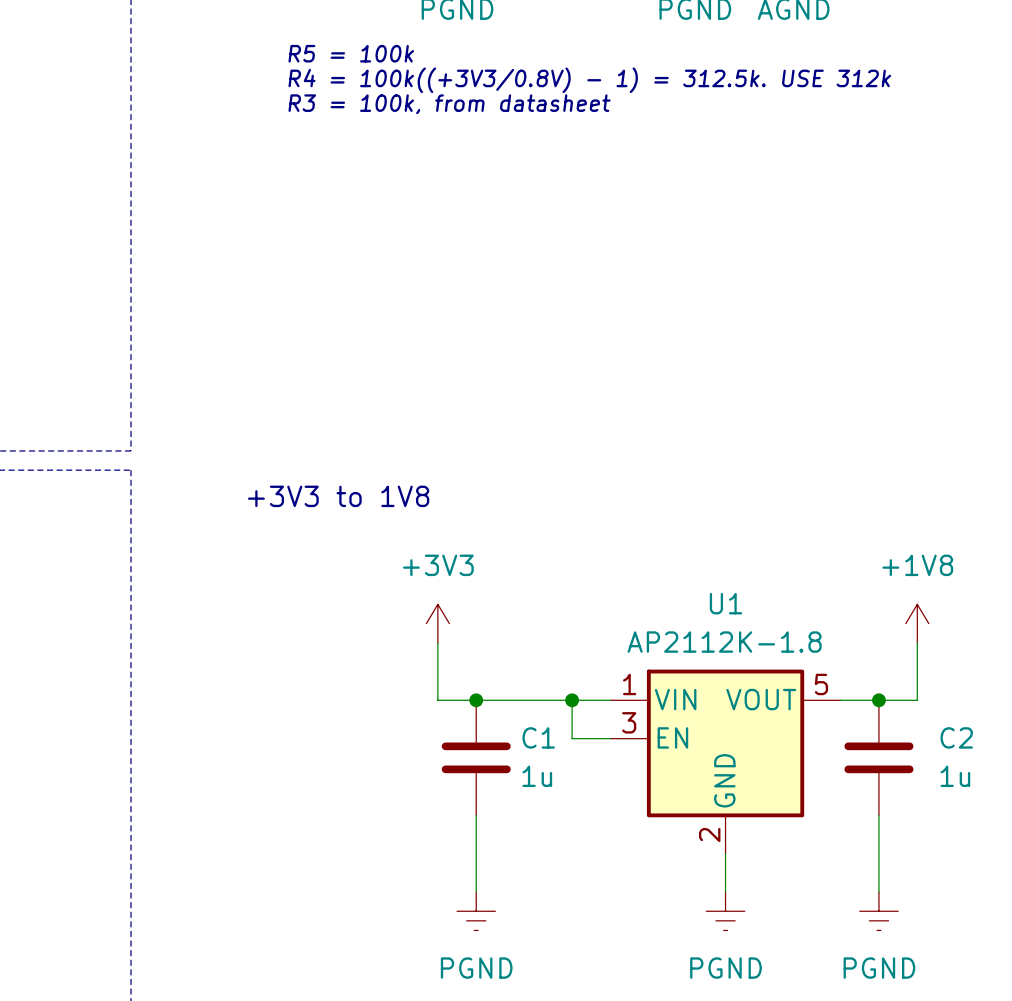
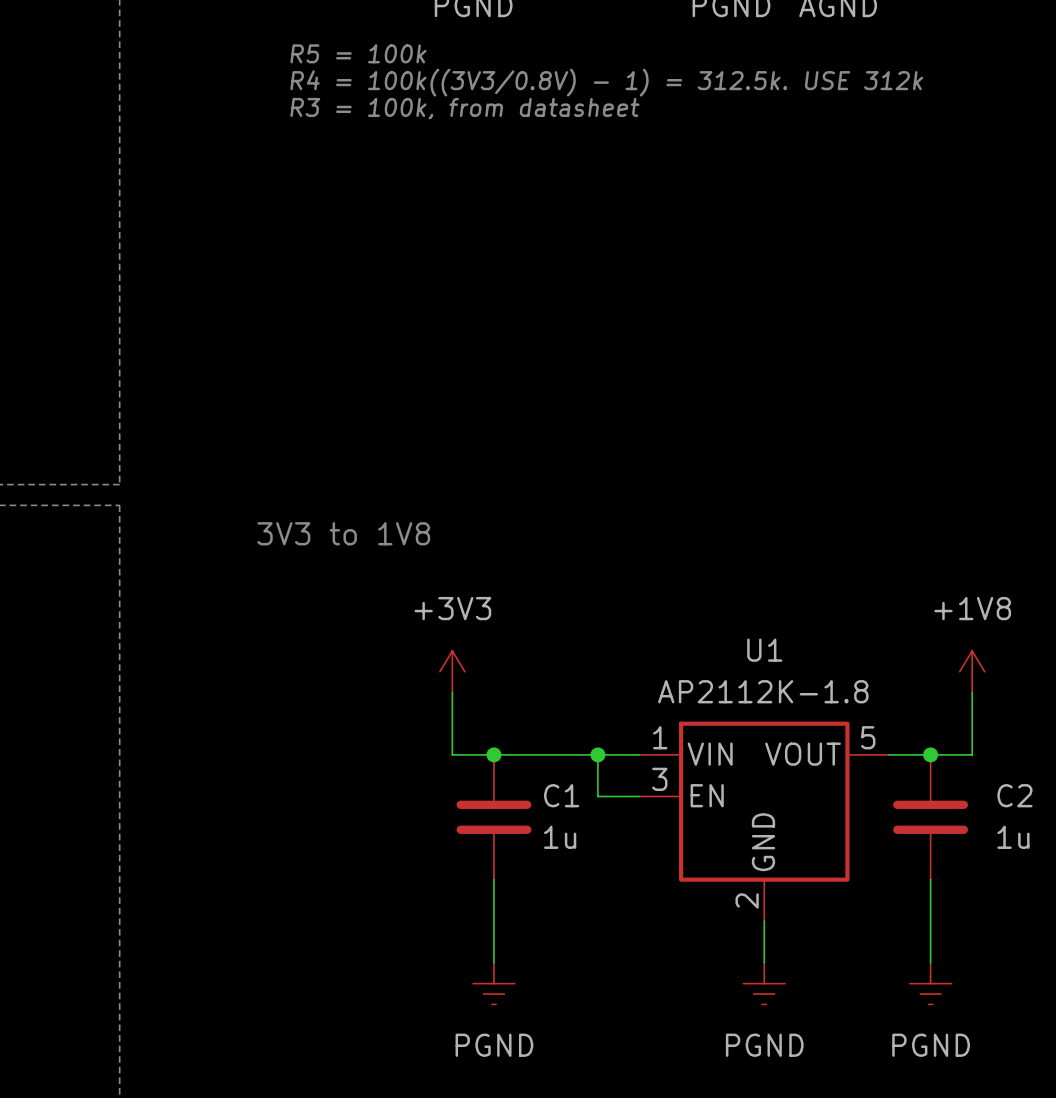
text: R4 = 100k((+3V3/0.8V) - 1) = 312.5k. USE 312k (589, 80) -> R4 = 100k((3V3/0.8V) - 1) = 312.5k. USE 312k (606, 82)
text: +3V3 to 1V8 (338, 496) -> 3V3 to 1V8 (343, 533)

